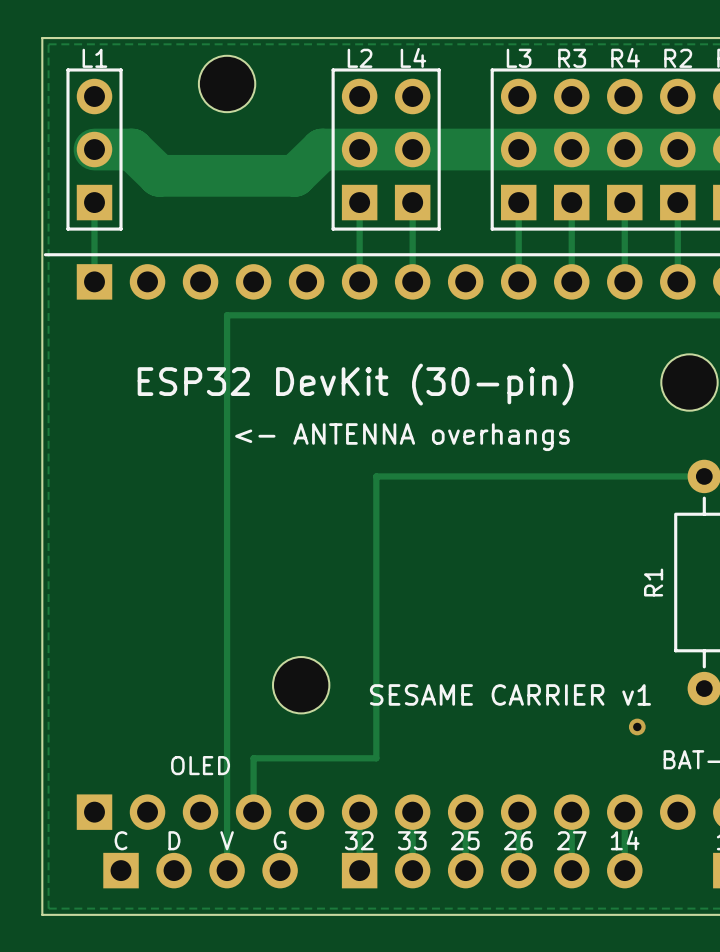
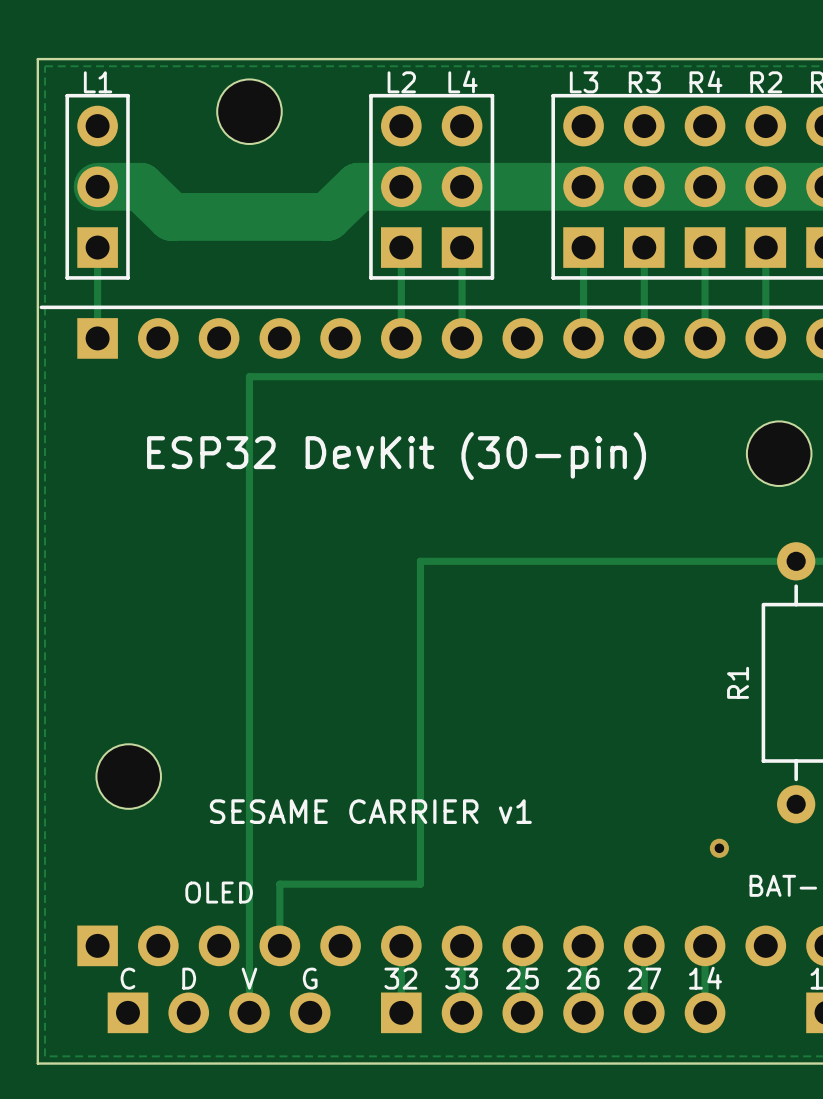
text: <- ANTENNA overhangs (402, 437) -> none
part position: (301, 685) -> (128, 776)
text position: SESAME CARRIER v1 (510, 694) -> SESAME CARRIER v1 (370, 811)

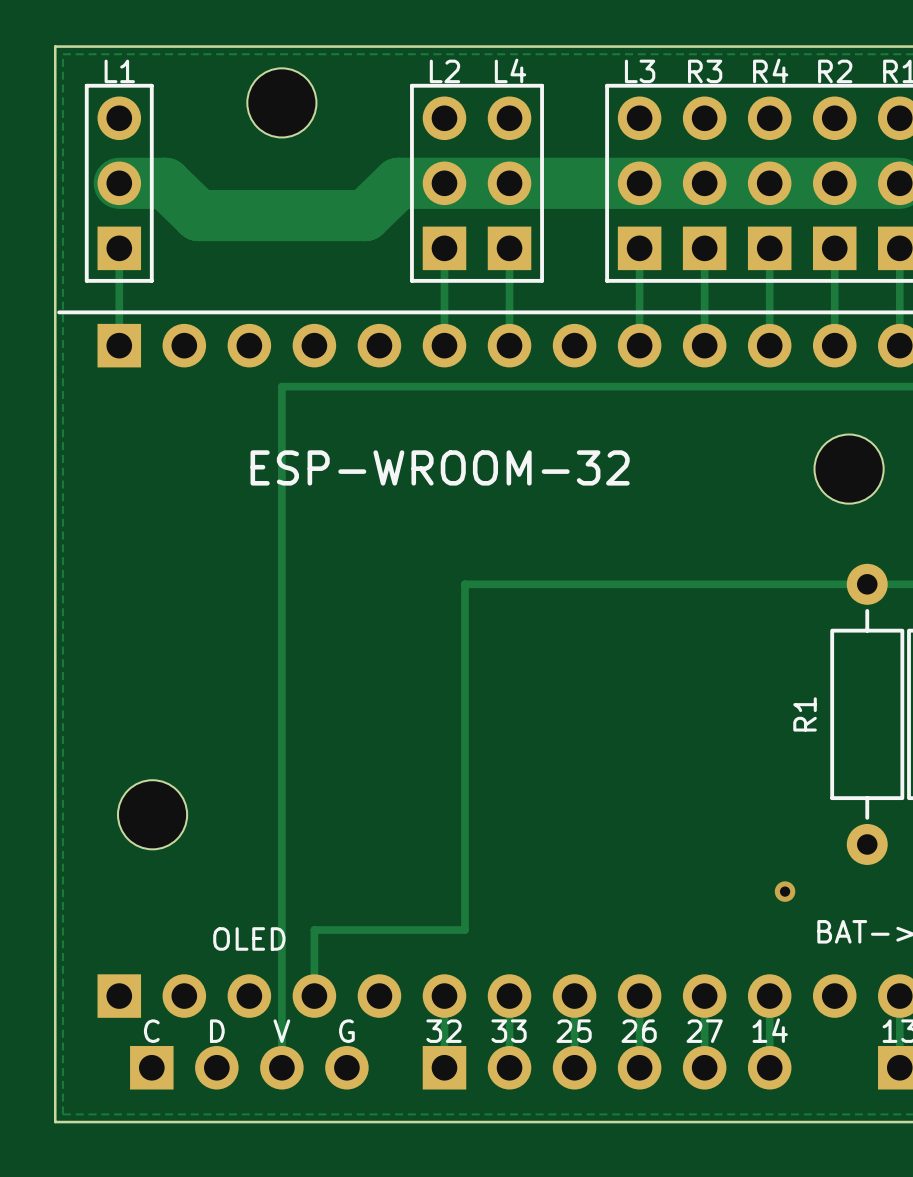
text: ESP32 DevKit (30-pin) (396, 456) -> ESP-WROOM-32 (440, 467)
text: SESAME CARRIER v1 (370, 811) -> none

